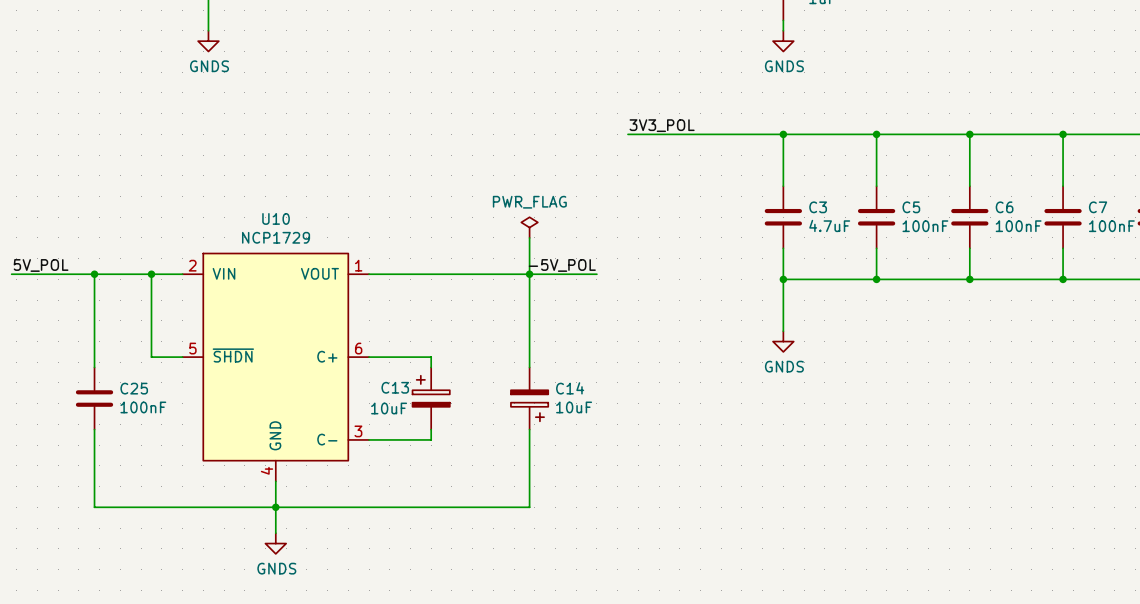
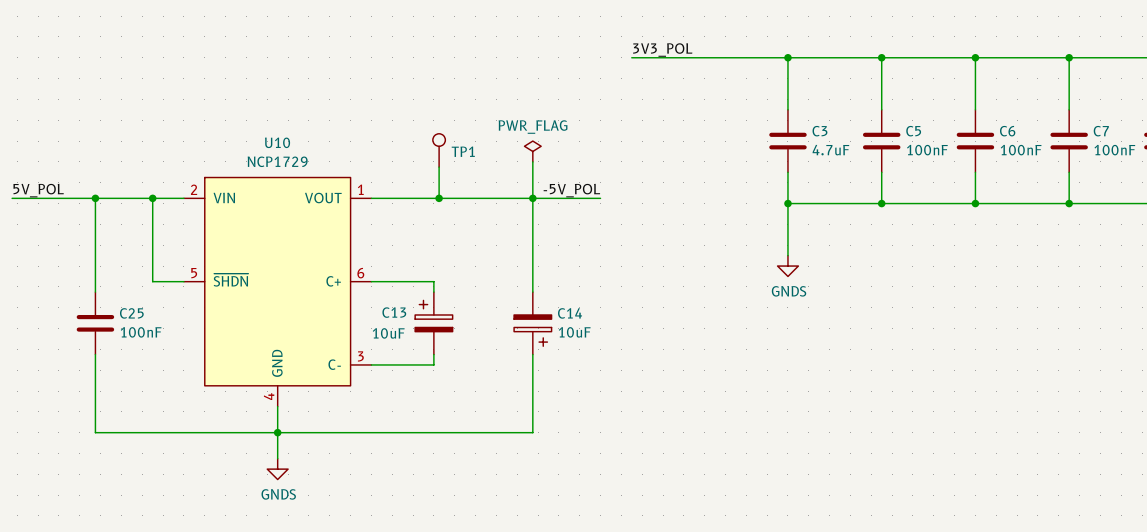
TP1: none -> (439, 150)
wire: none -> (439, 167) (439, 198)
junction: none -> (439, 198)

